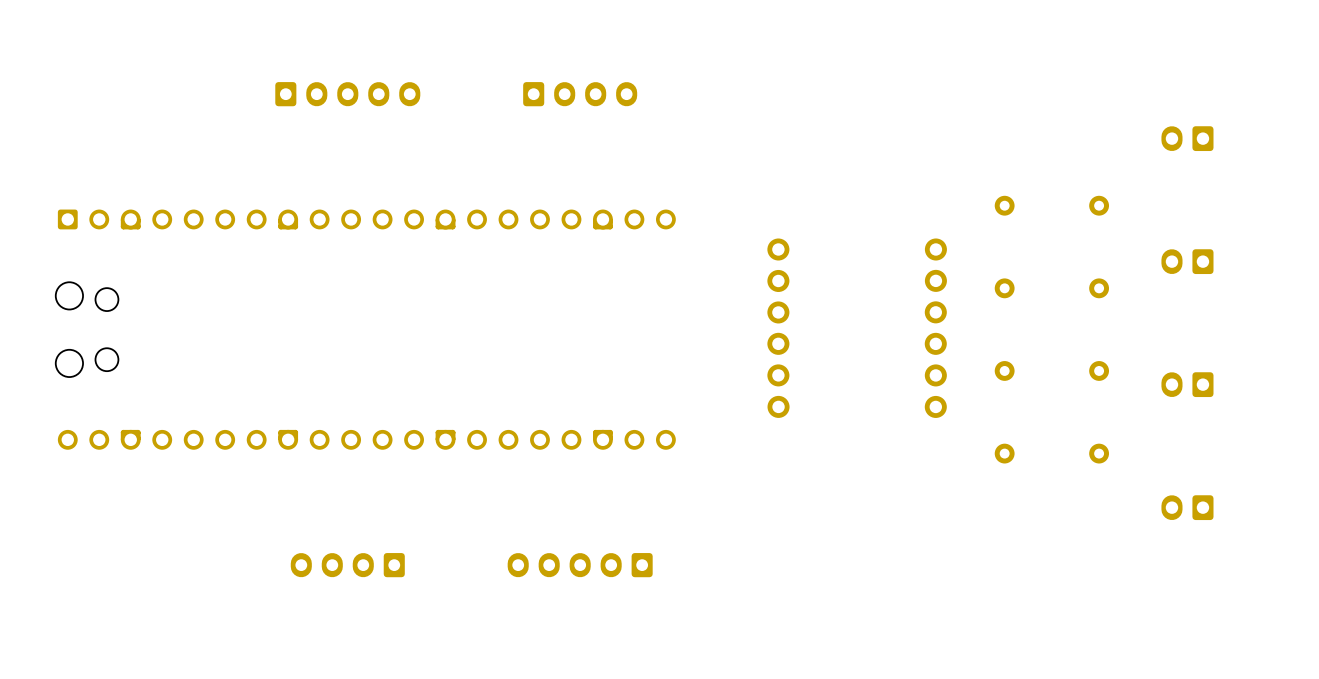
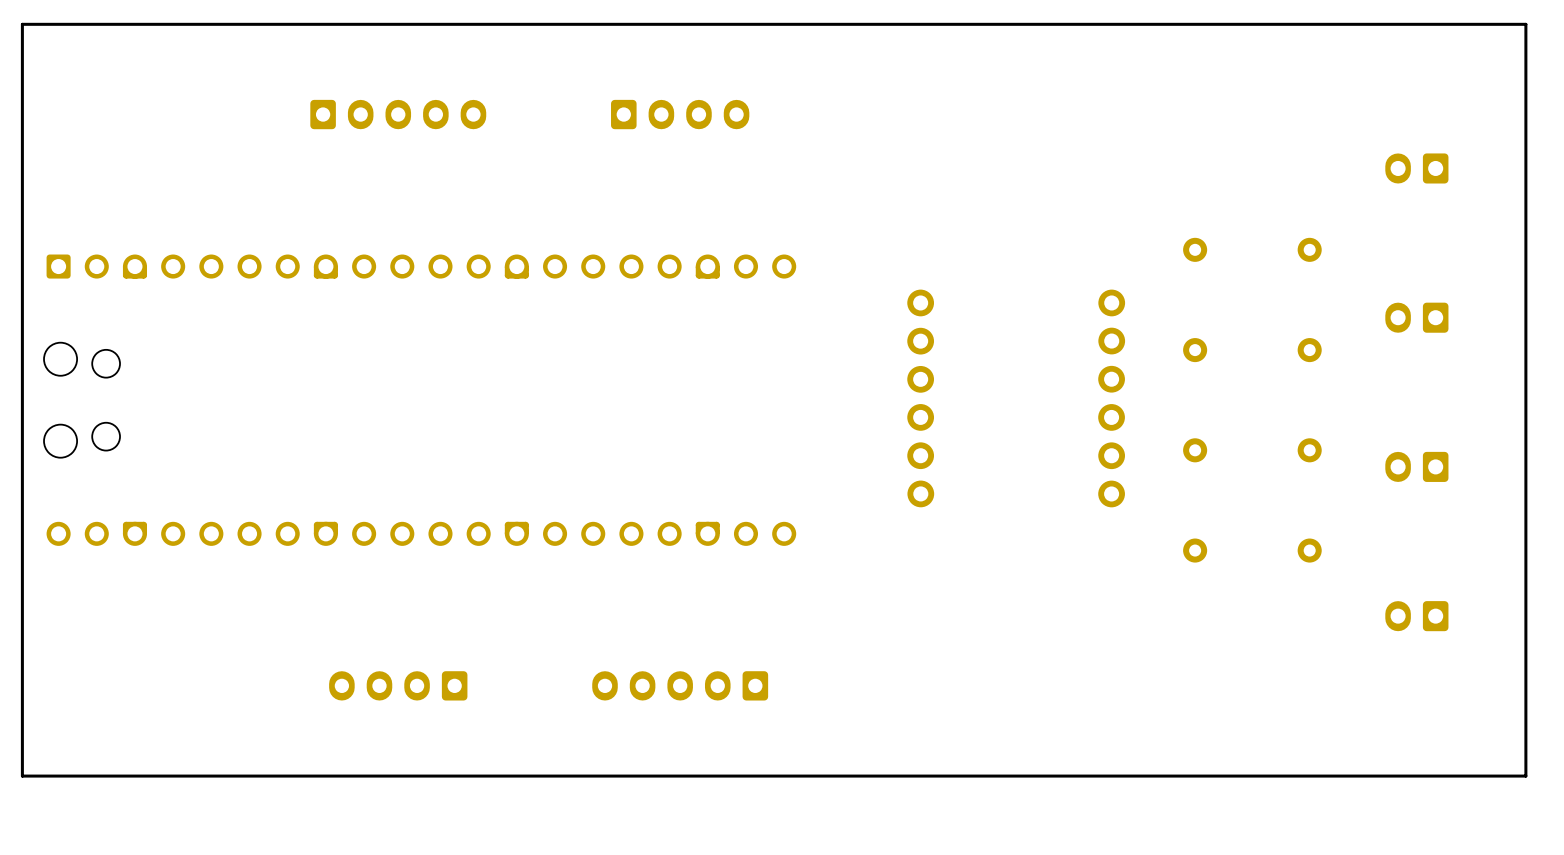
board edge: none -> (1525, 24) (22, 24) (22, 776) (1525, 776) (1525, 24)

